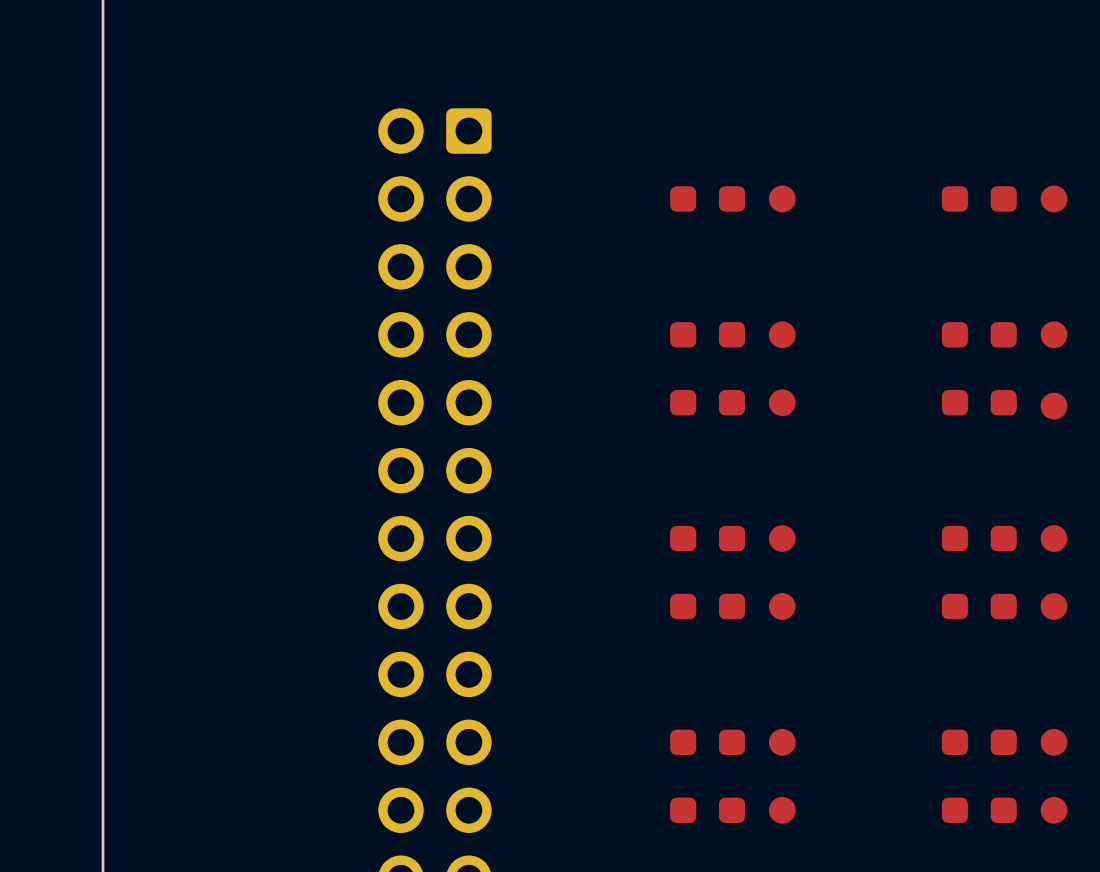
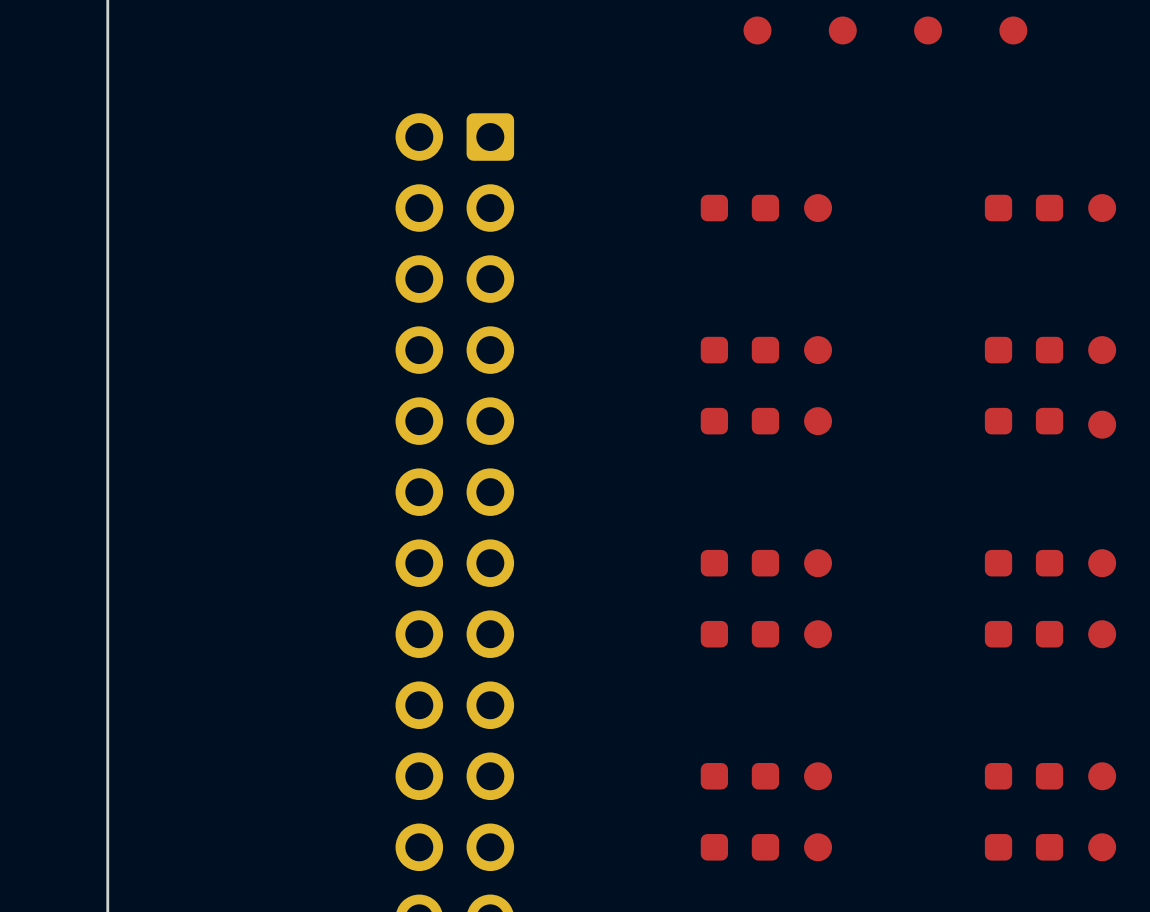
part: none -> (757, 30)
part: none -> (842, 30)
part: none -> (928, 30)
part: none -> (1013, 30)

